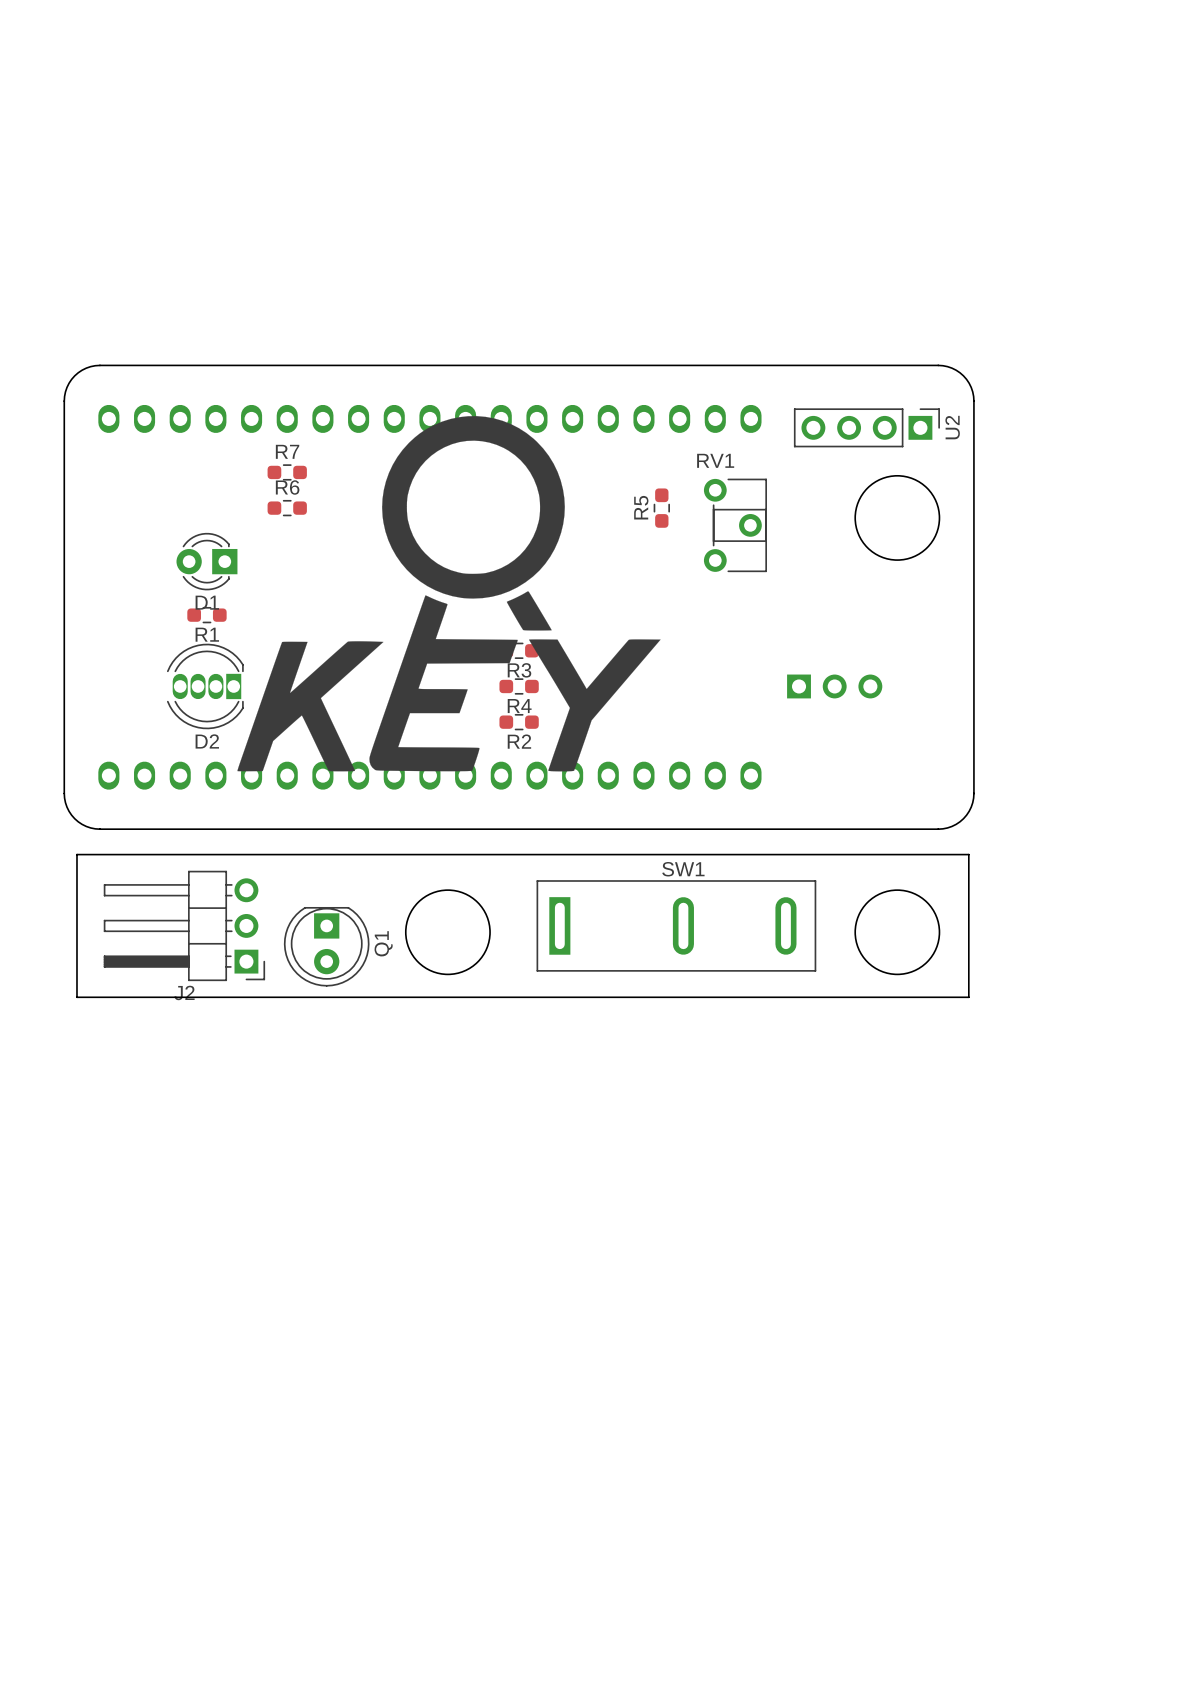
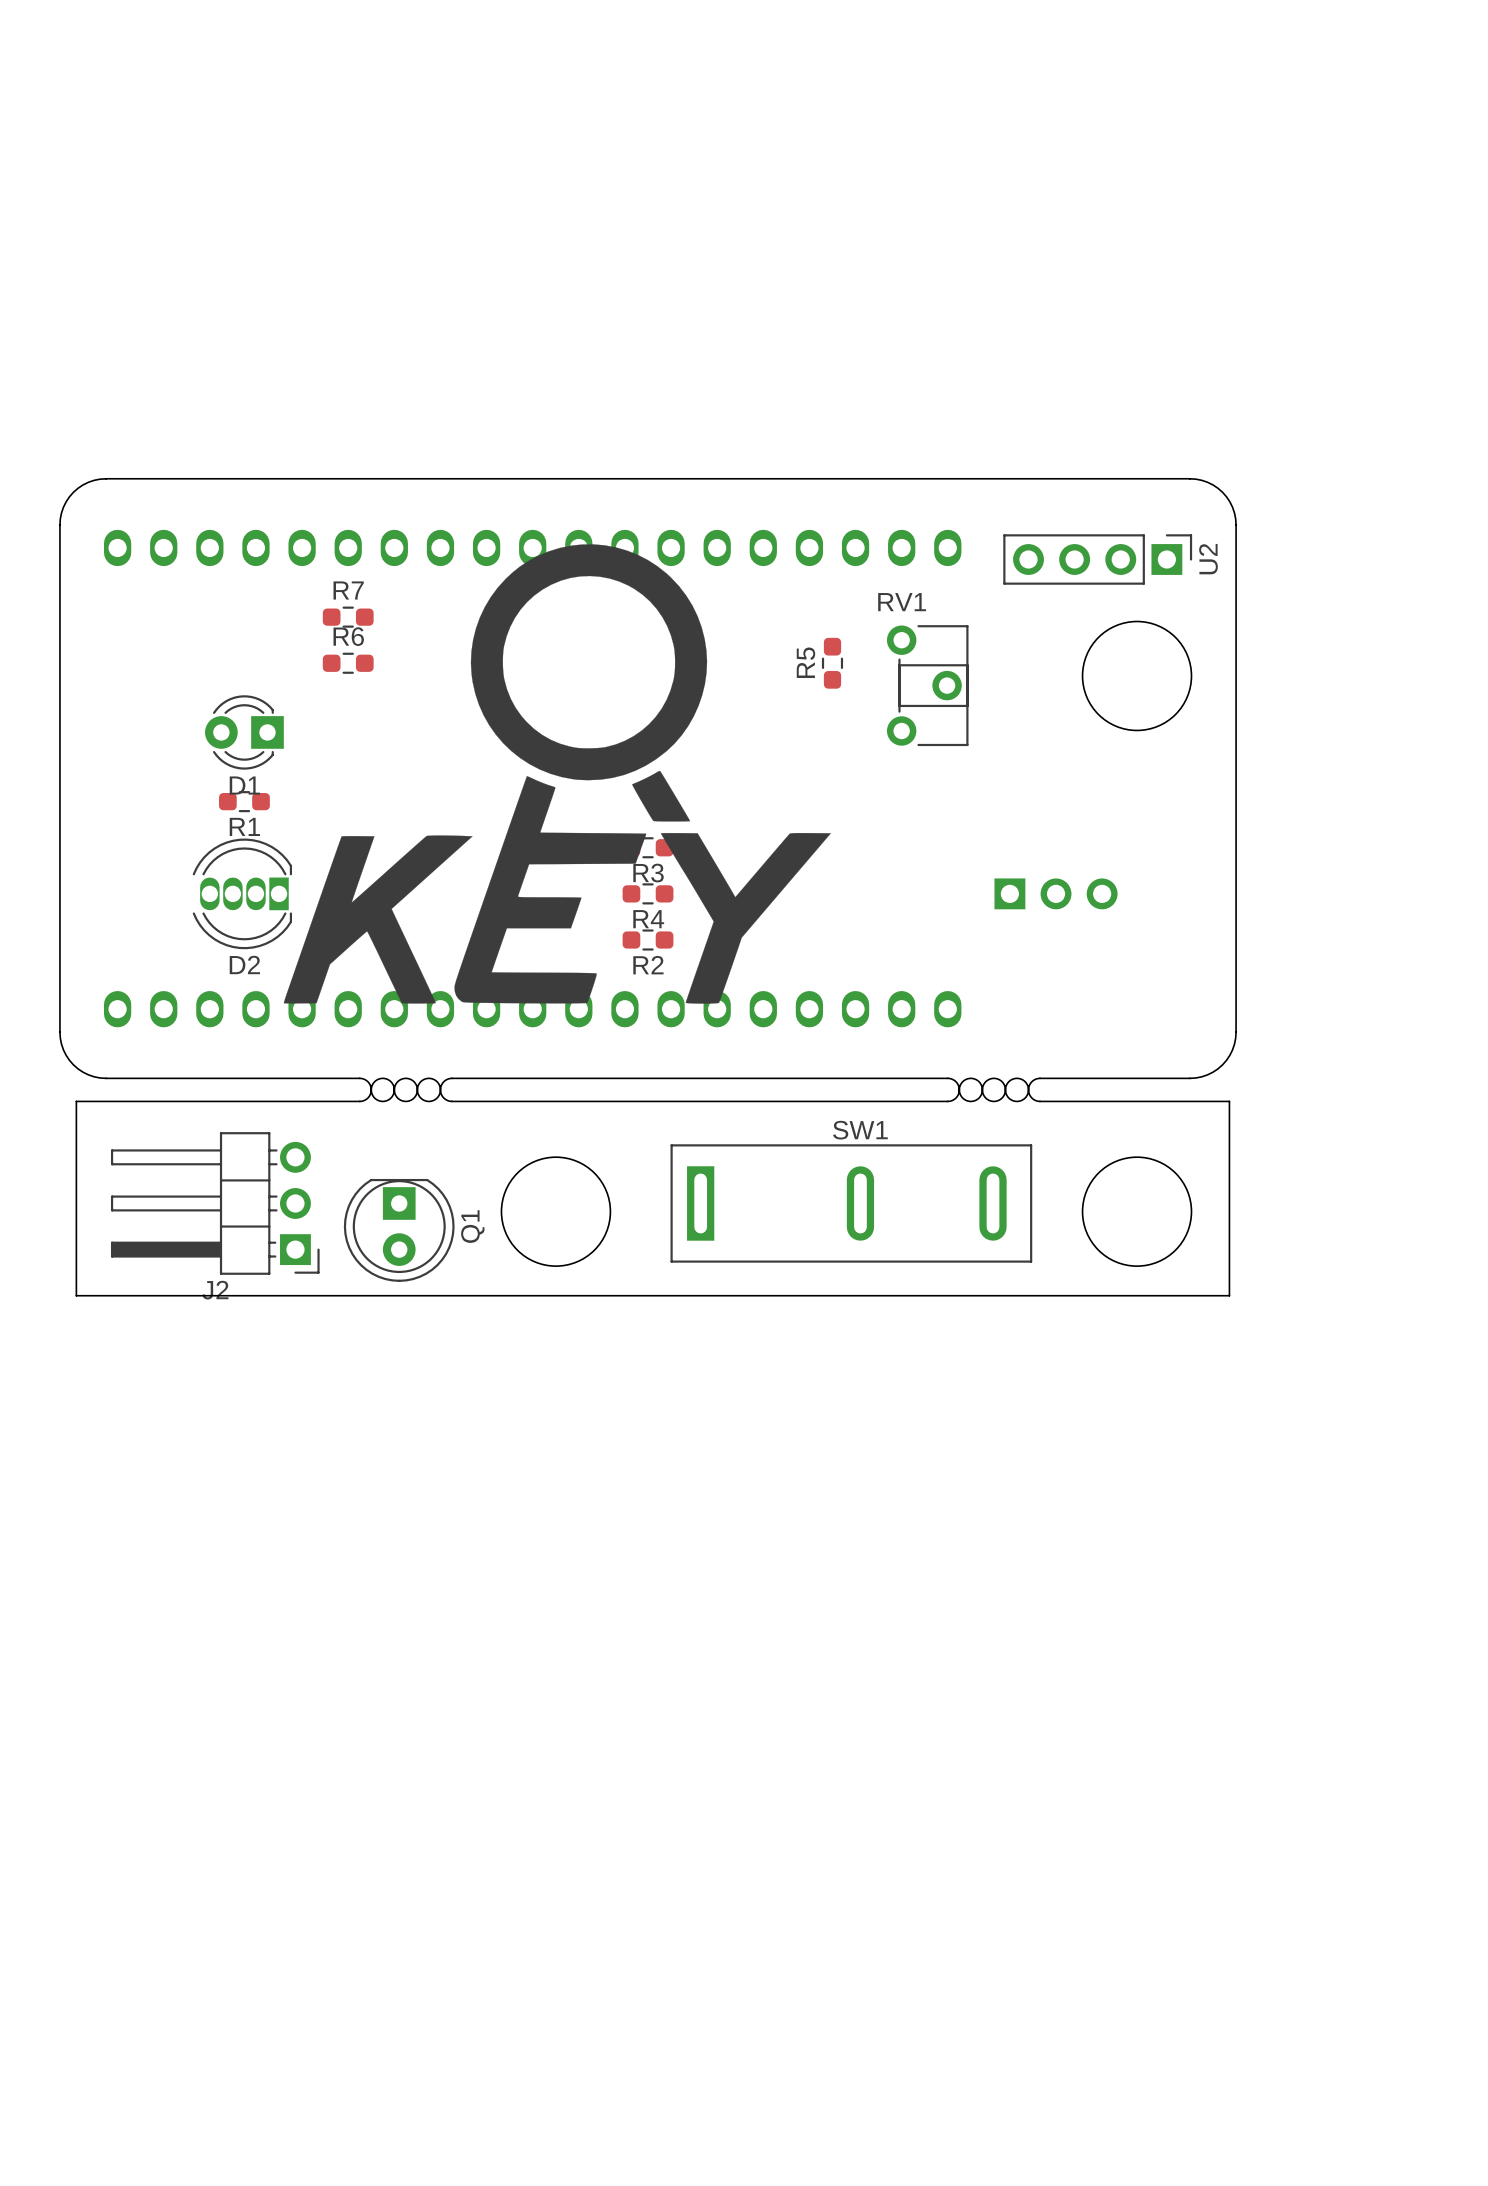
round board edge: none -> [370, 1077, 395, 1102]
round board edge: none -> [393, 1077, 418, 1102]
round board edge: none -> [416, 1077, 441, 1102]
round board edge: none -> [958, 1077, 983, 1102]
round board edge: none -> [981, 1077, 1006, 1102]
round board edge: none -> [1005, 1077, 1029, 1102]
board edge: (296, 829) (367, 829) -> (359, 1078) (367, 1081) (371, 1088) (368, 1096) (361, 1101) (76, 1101) (76, 1111)
board edge: none -> (451, 1078) (443, 1081) (440, 1089) (443, 1098) (451, 1101) (947, 1101) (955, 1098) (959, 1089) (955, 1081) (947, 1078)
board edge: (750, 829) (822, 829) -> (1229, 1111) (1229, 1101) (1038, 1101) (1031, 1098) (1028, 1089) (1031, 1081) (1040, 1078)
board edge: (76, 854) (968, 854) -> none

